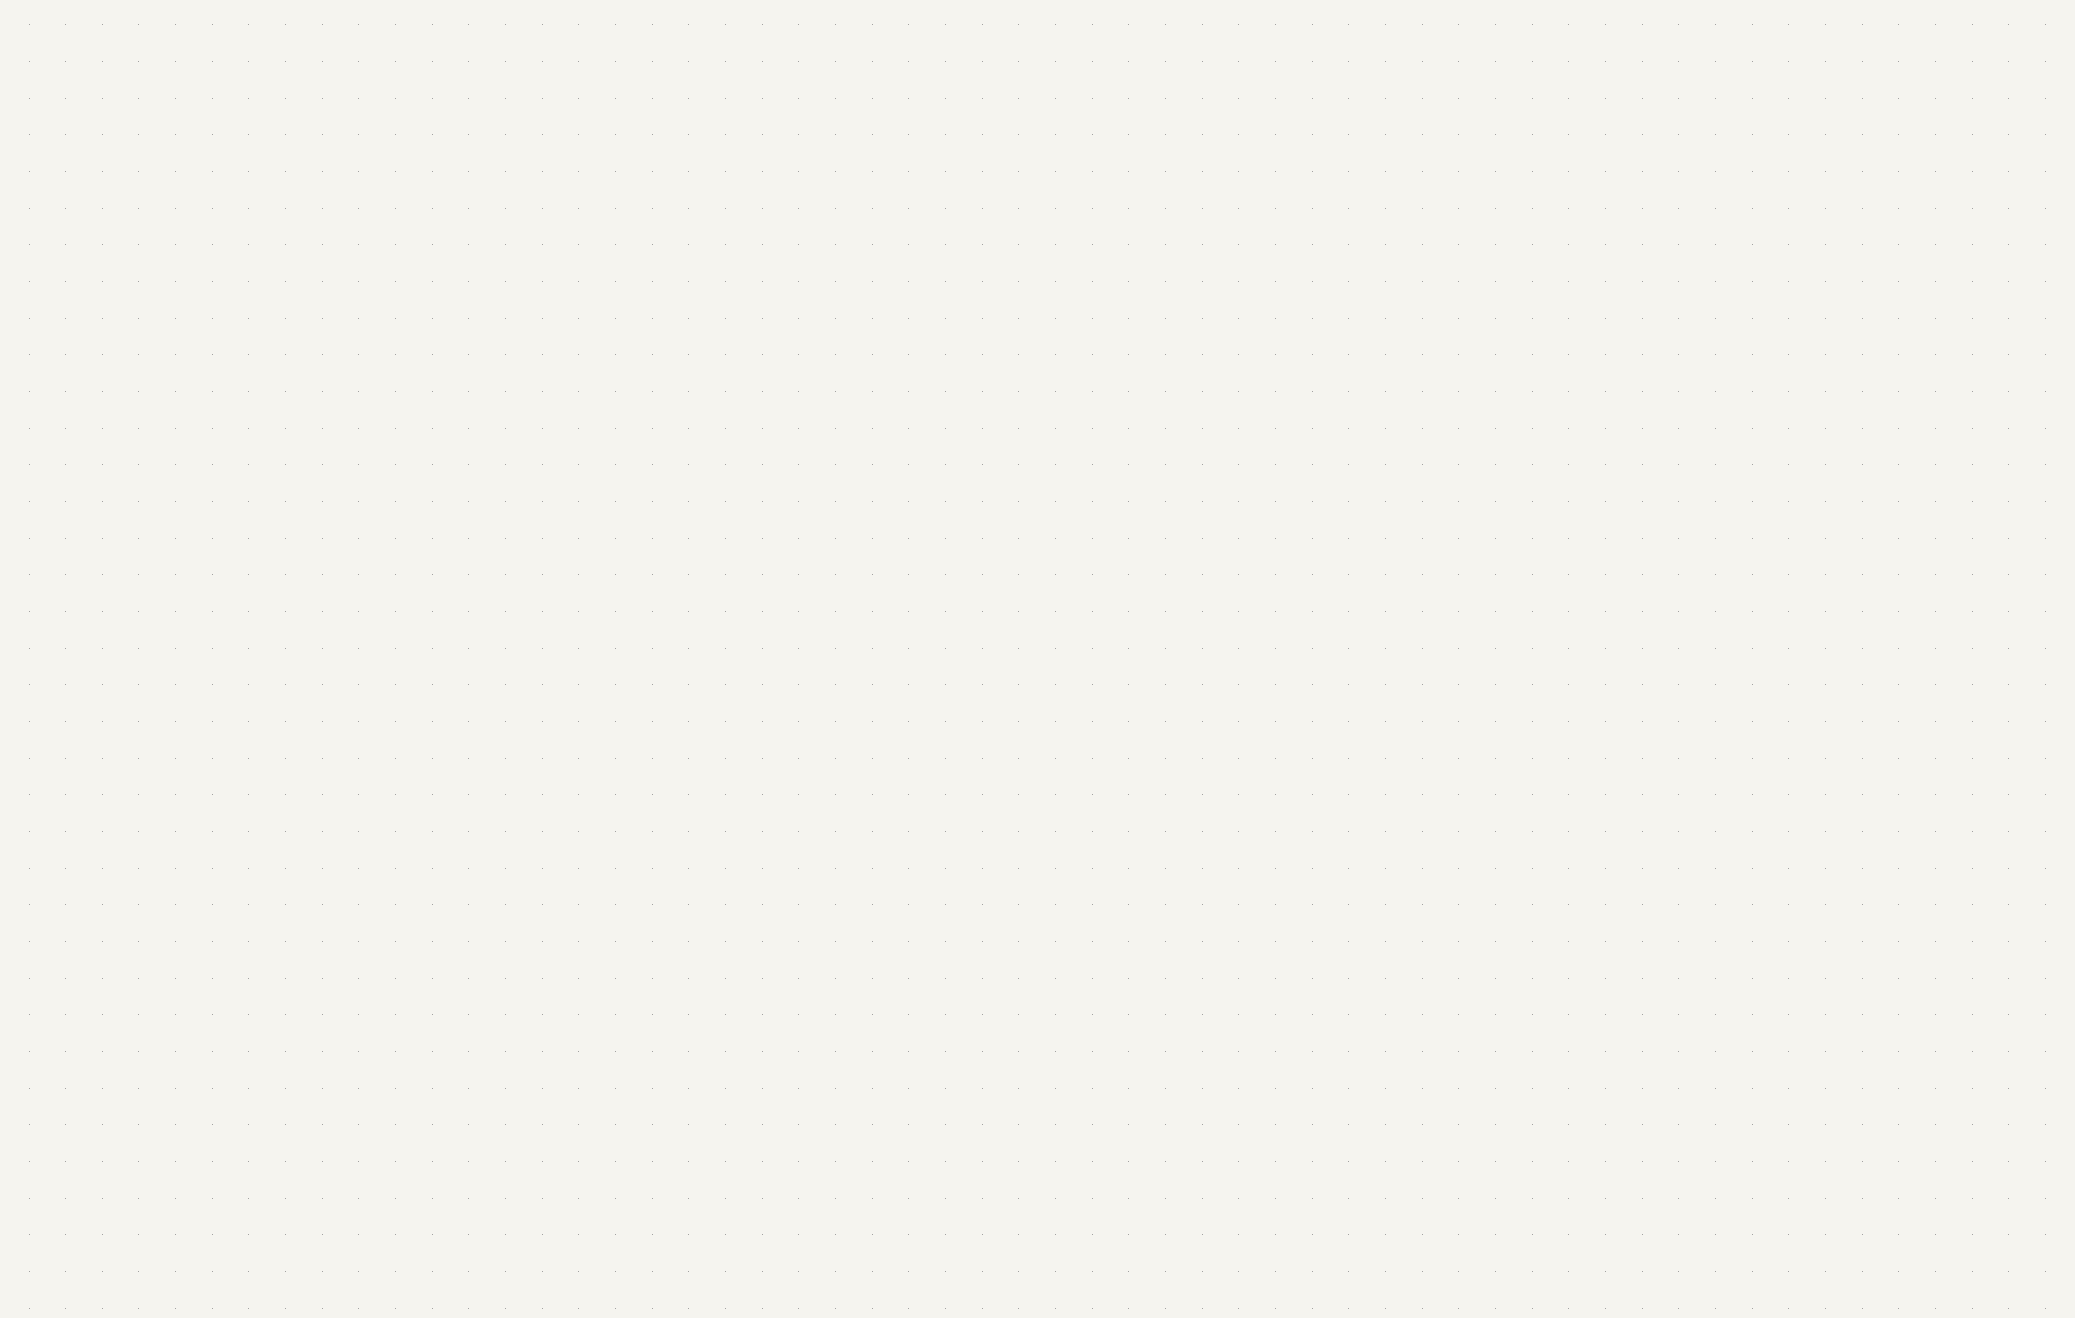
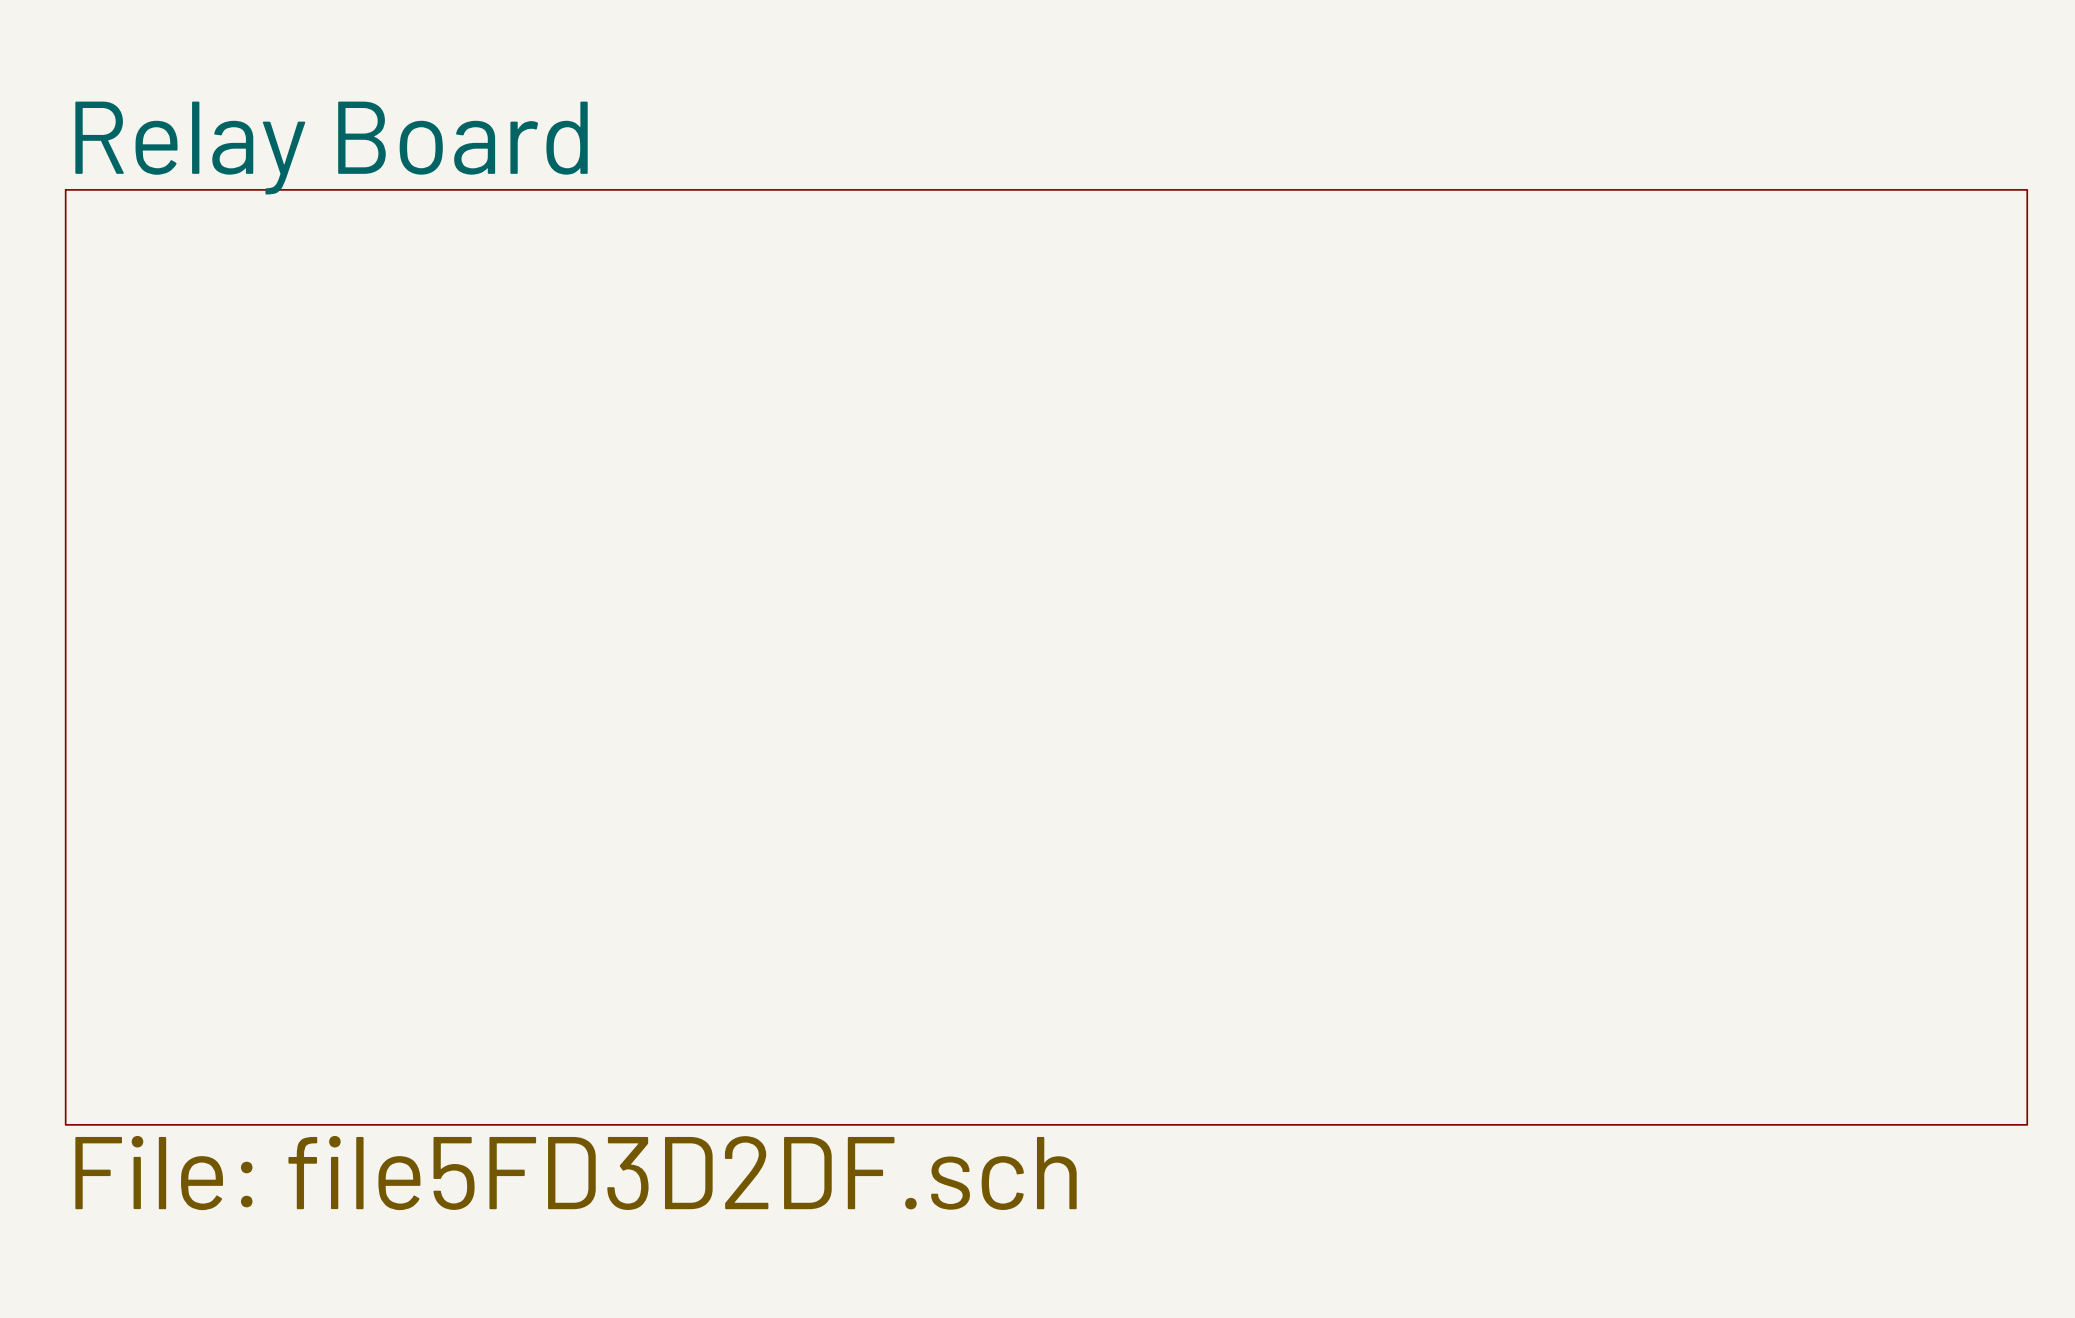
sheet Relay Board: none -> File: file5FD3D2DF.sch (1046, 657)

